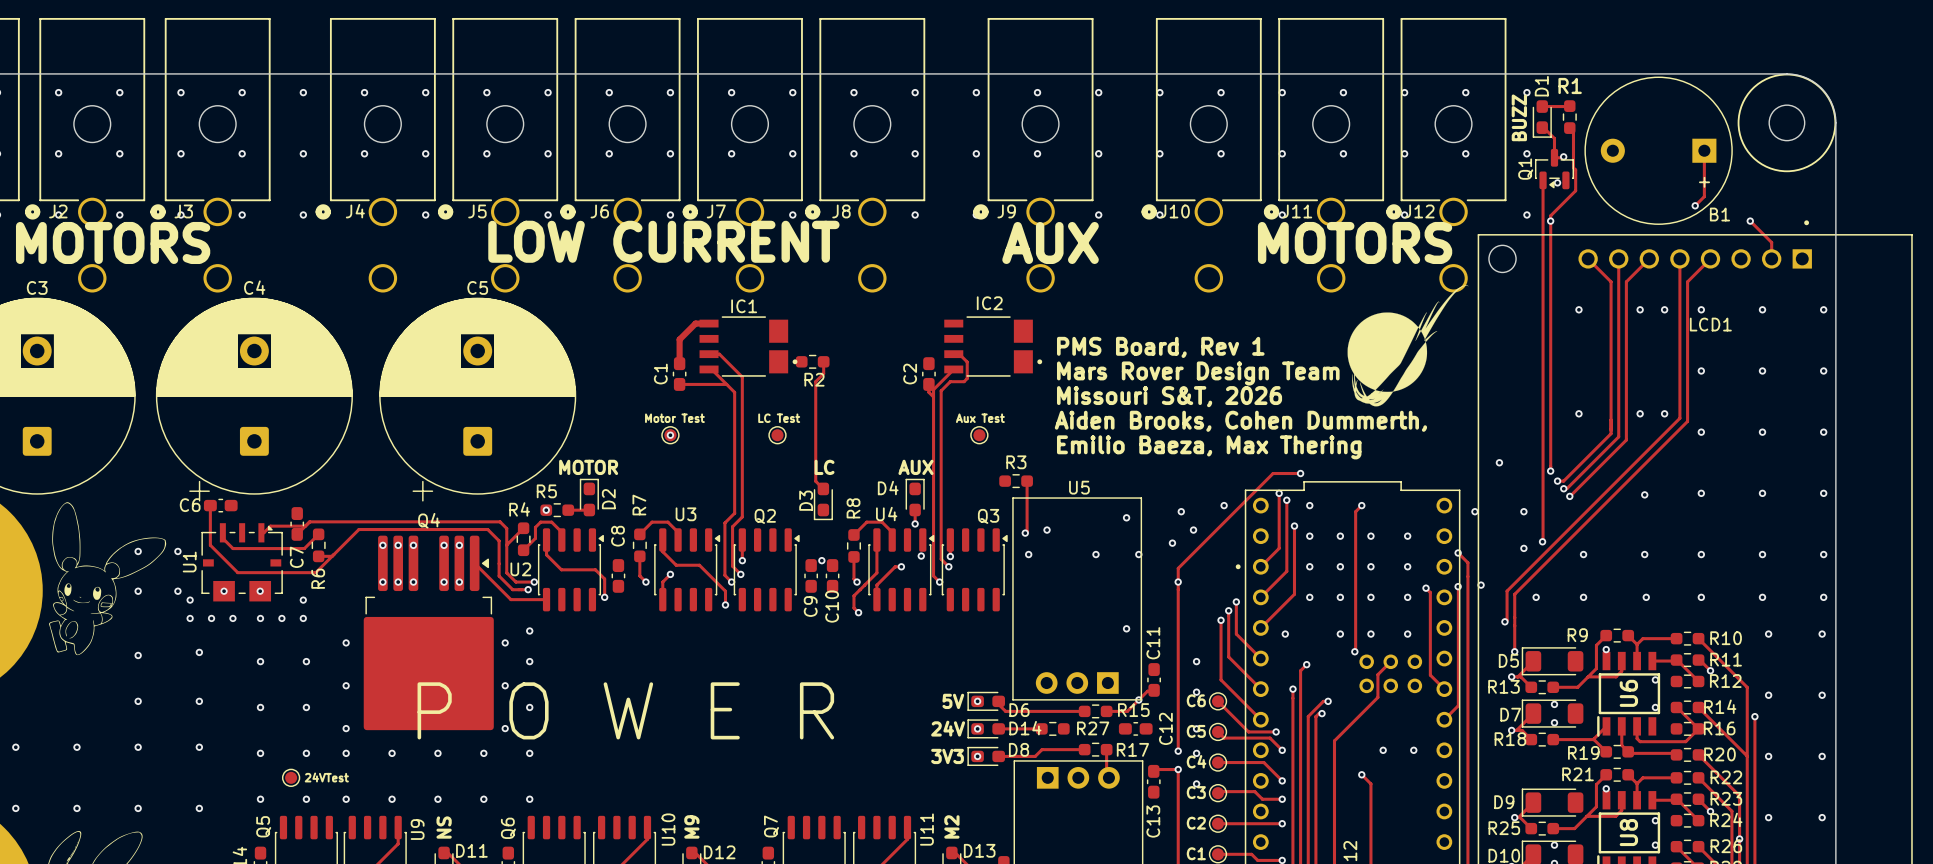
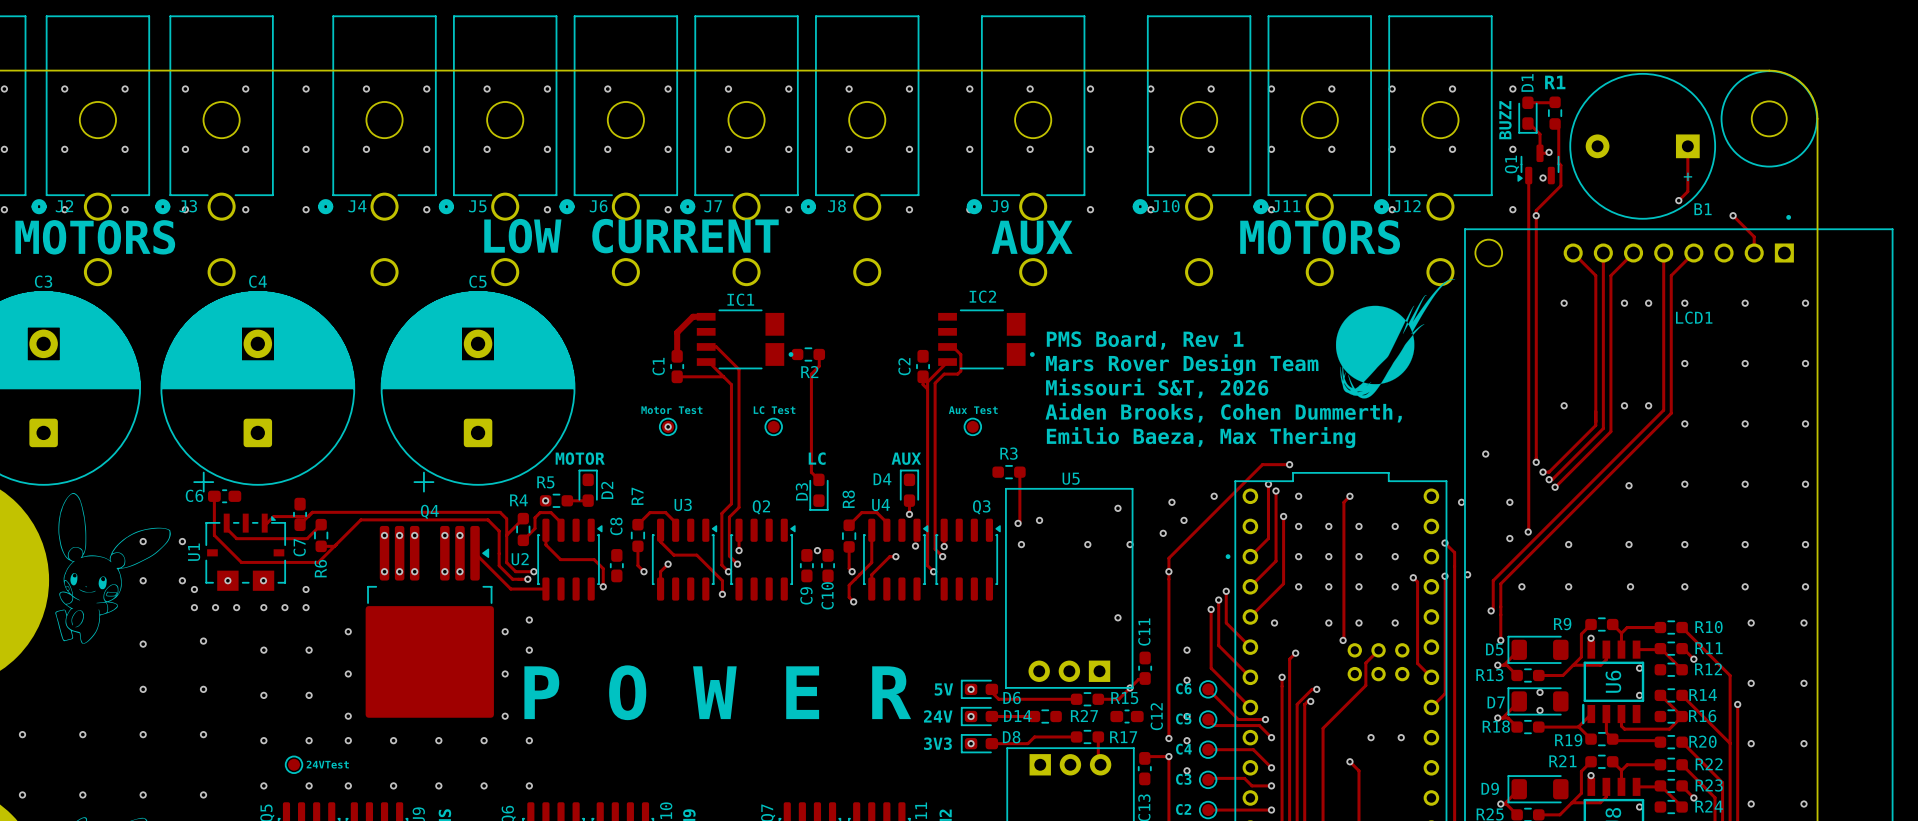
Q1 footprint: [1534, 148, 1575, 190] -> [1517, 144, 1560, 185]
text position: P O W E R (625, 710) -> P O W E R (717, 692)

